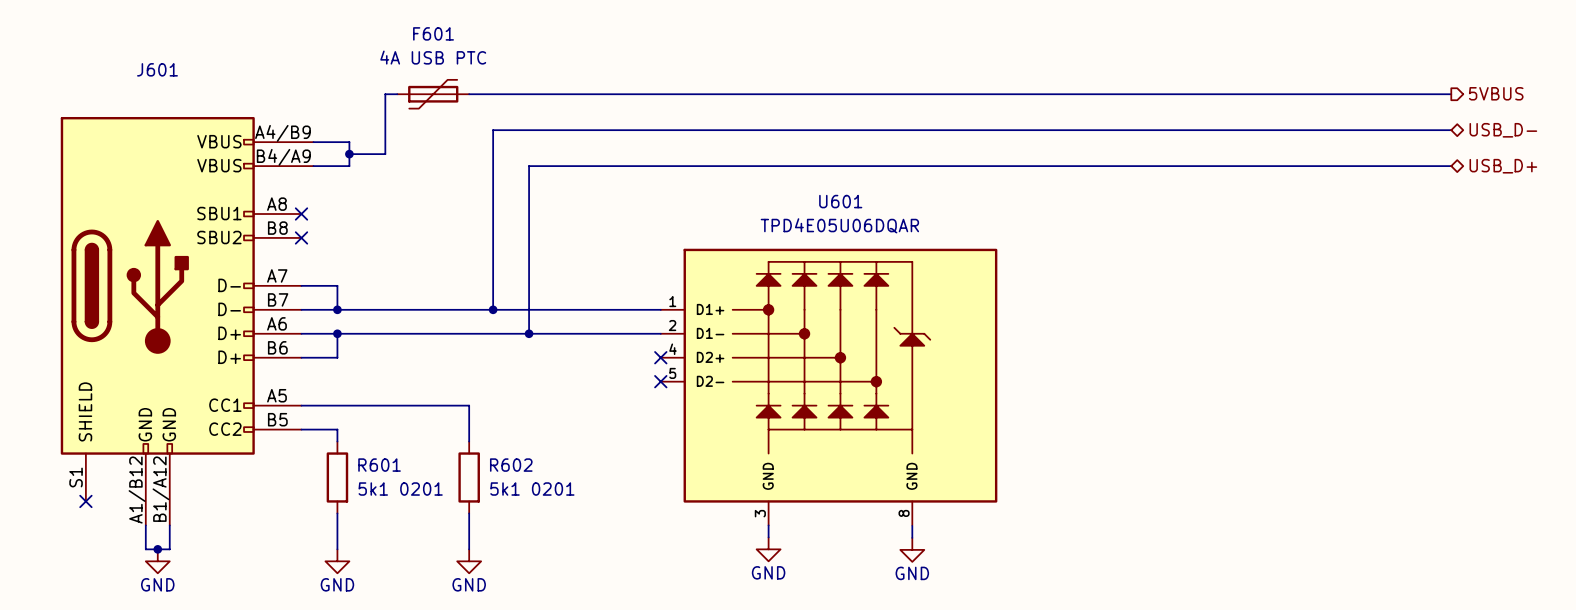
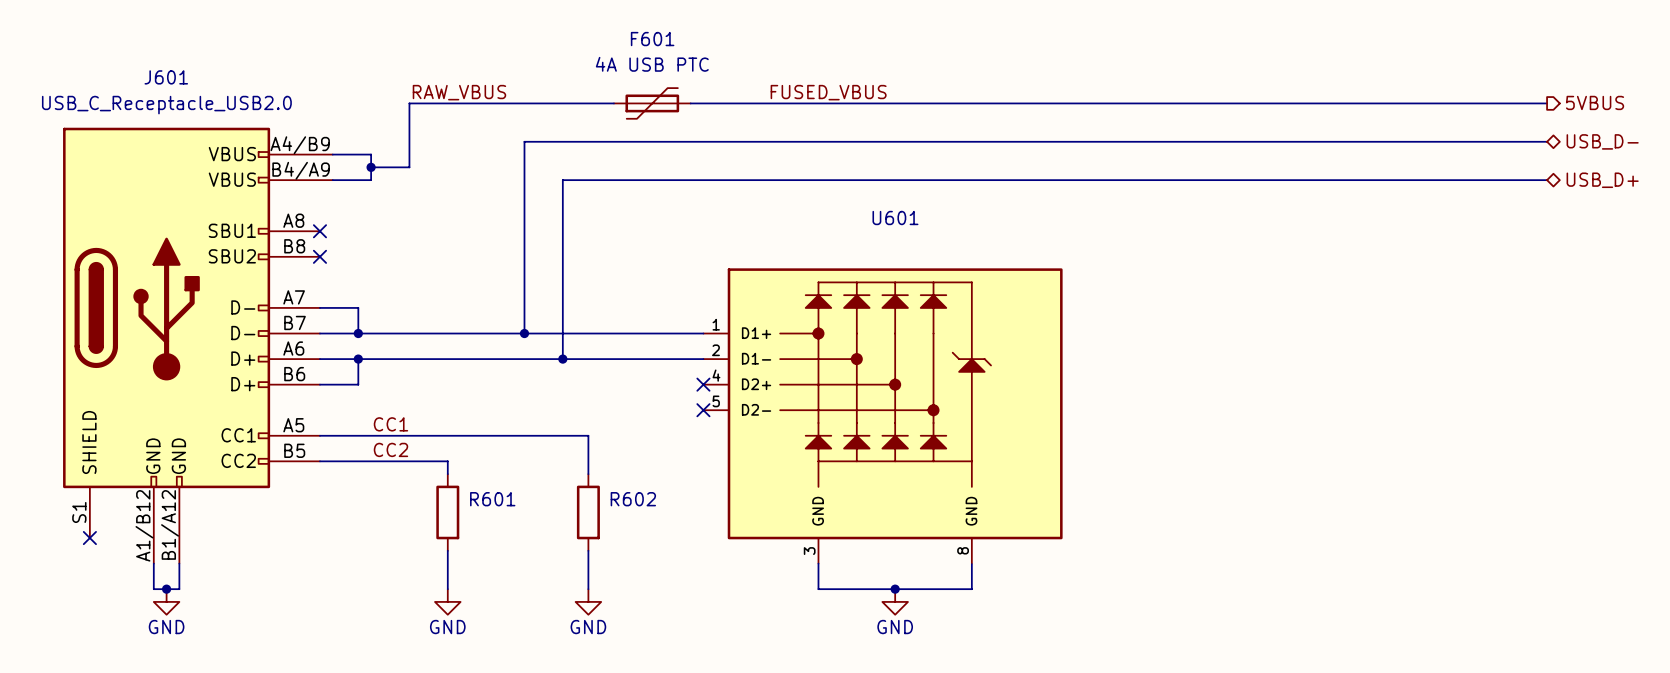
label: none -> RAW_VBUS (459, 92)
label: none -> FUSED_VBUS (828, 92)
F601 position: (433, 94) -> (652, 103)
J601 value: none -> USB_C_Receptacle_USB2.0 (166, 105)
U601 value: TPD4E05U06DQAR (839, 225) -> none
label: none -> CC1 (390, 424)
wire: (469, 405) (469, 441) -> (498, 435) (588, 435) (588, 474)
label: none -> CC2 (390, 449)
wire: (337, 429) (337, 441) -> (358, 461) (447, 461) (447, 474)
R601 position: (337, 477) -> (447, 512)
R602 position: (469, 477) -> (588, 512)
R601 value: 5k1 0201 (400, 489) -> none
R602 value: 5k1 0201 (532, 489) -> none
wire: (337, 513) (337, 549) -> (447, 550) (447, 589)
wire: (469, 513) (469, 549) -> (588, 550) (588, 589)
wire: none -> (818, 576) (818, 589) (971, 589) (971, 576)
power symbol: GND (768, 549) -> none
junction: none -> (895, 589)
power symbol: GND (912, 549) -> none
power symbol: GND (337, 561) -> none
power symbol: none -> GND (447, 601)
power symbol: GND (469, 561) -> none
power symbol: none -> GND (588, 601)
power symbol: none -> GND (895, 601)

